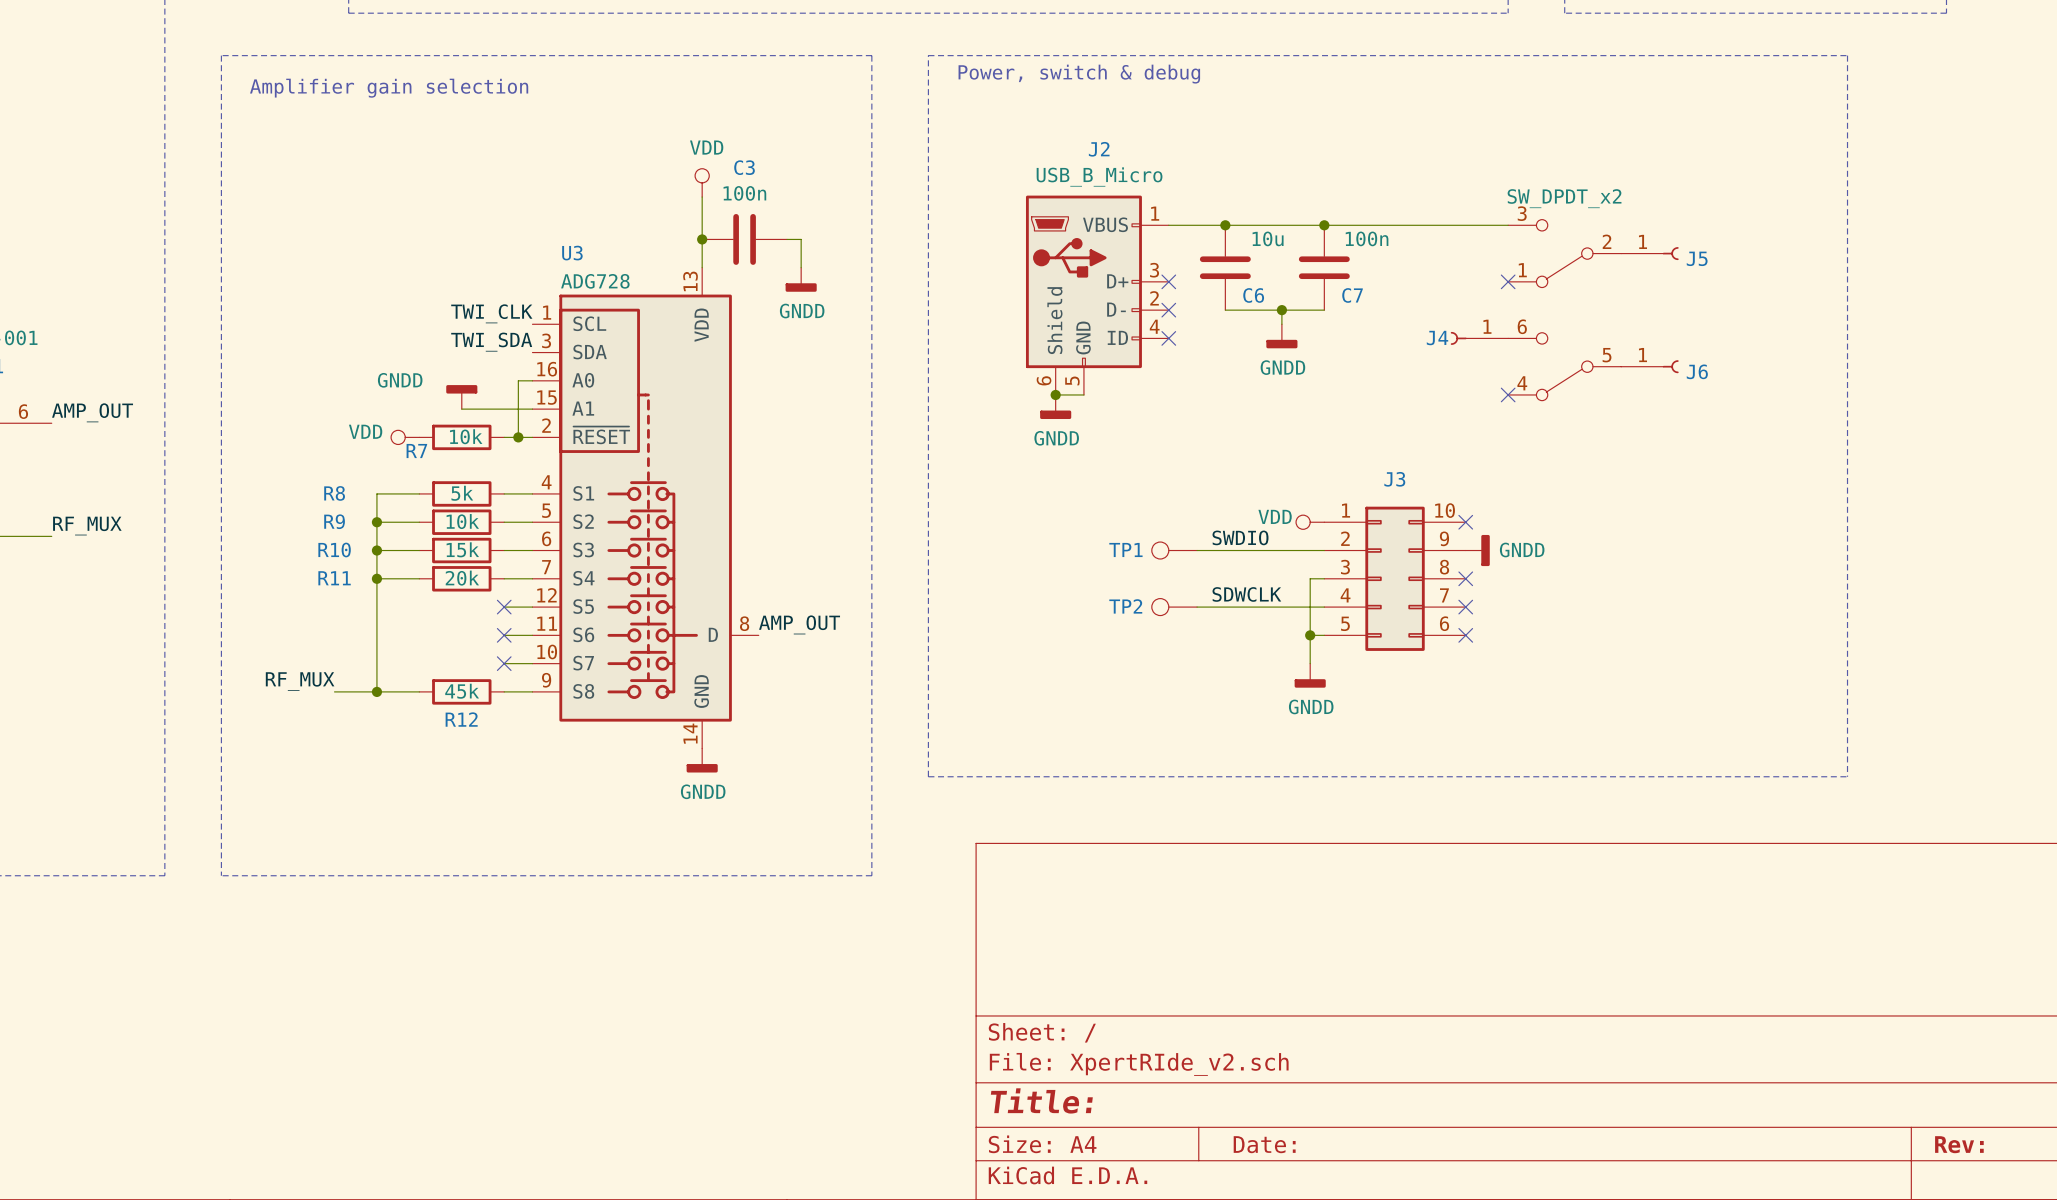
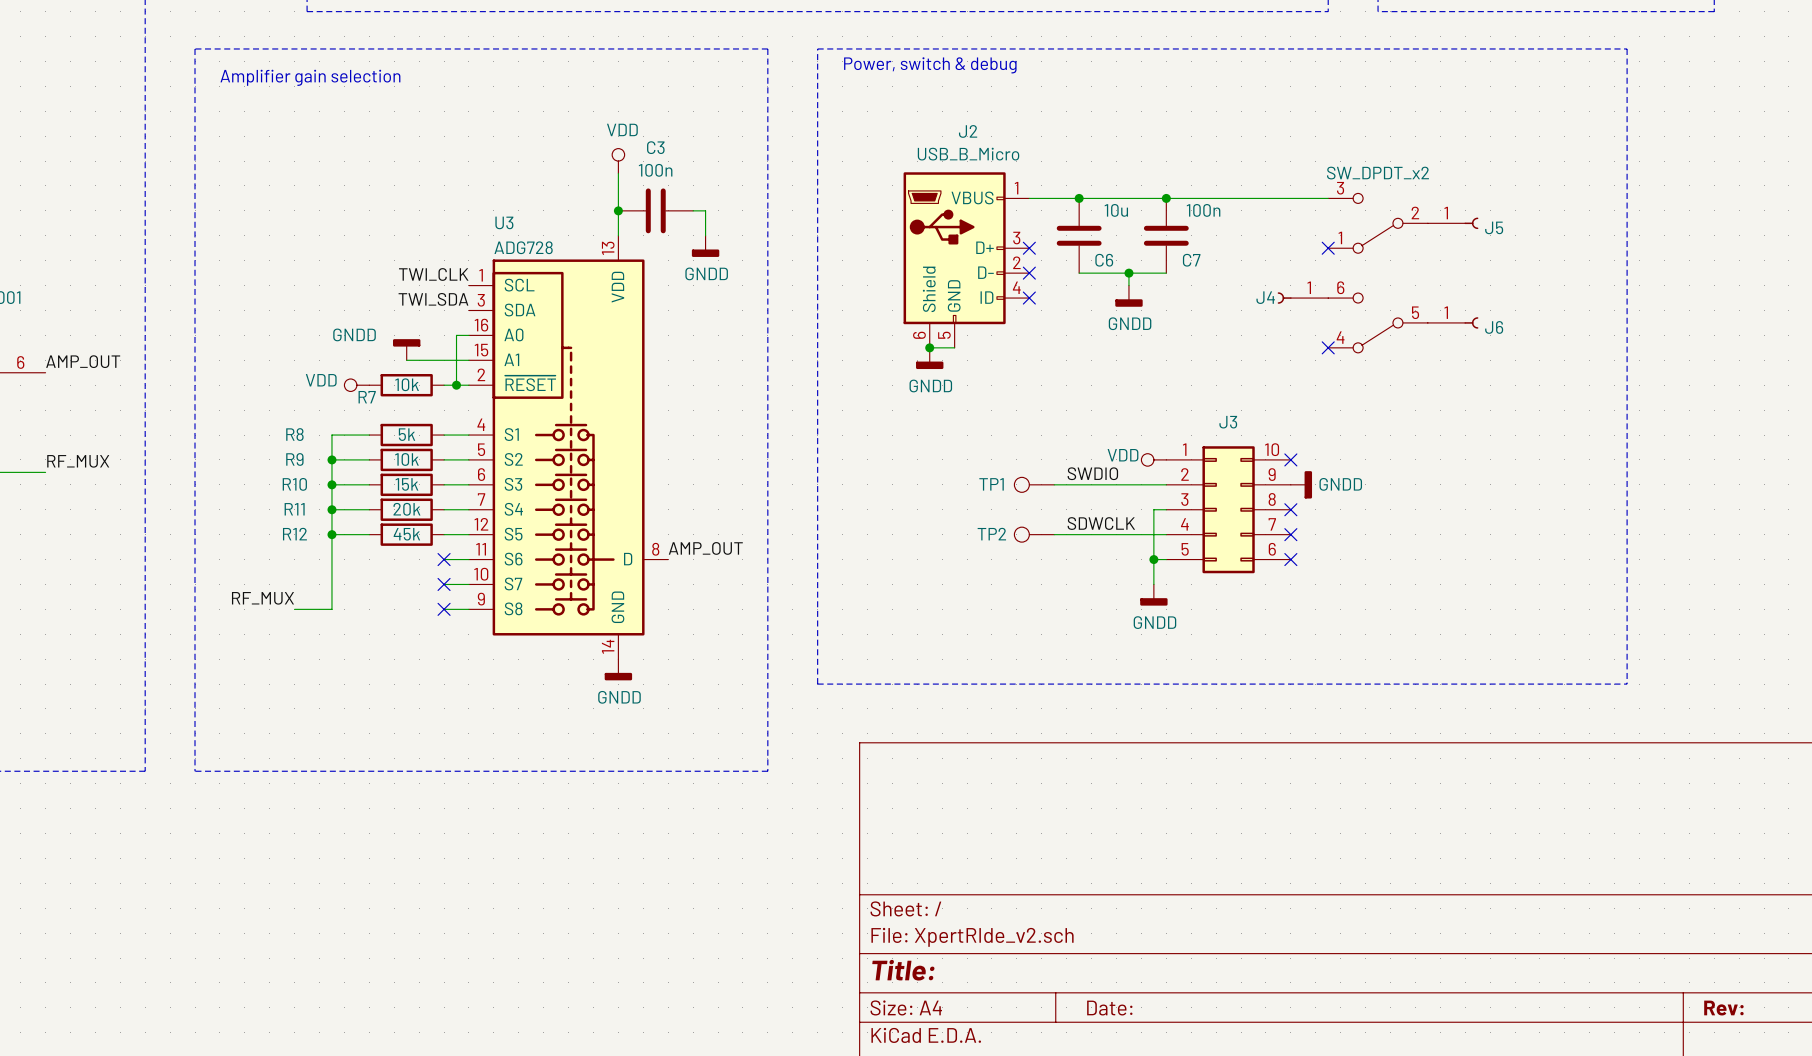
junction: none -> (331, 534)
no-connect mark: (504, 607) -> none
wire: (376, 691) (419, 691) -> (331, 534) (369, 534)
junction: (376, 691) -> none
R12 position: (461, 691) -> (406, 534)
no-connect mark: none -> (444, 609)
R12 name position: R12 (461, 719) -> R12 (294, 534)

